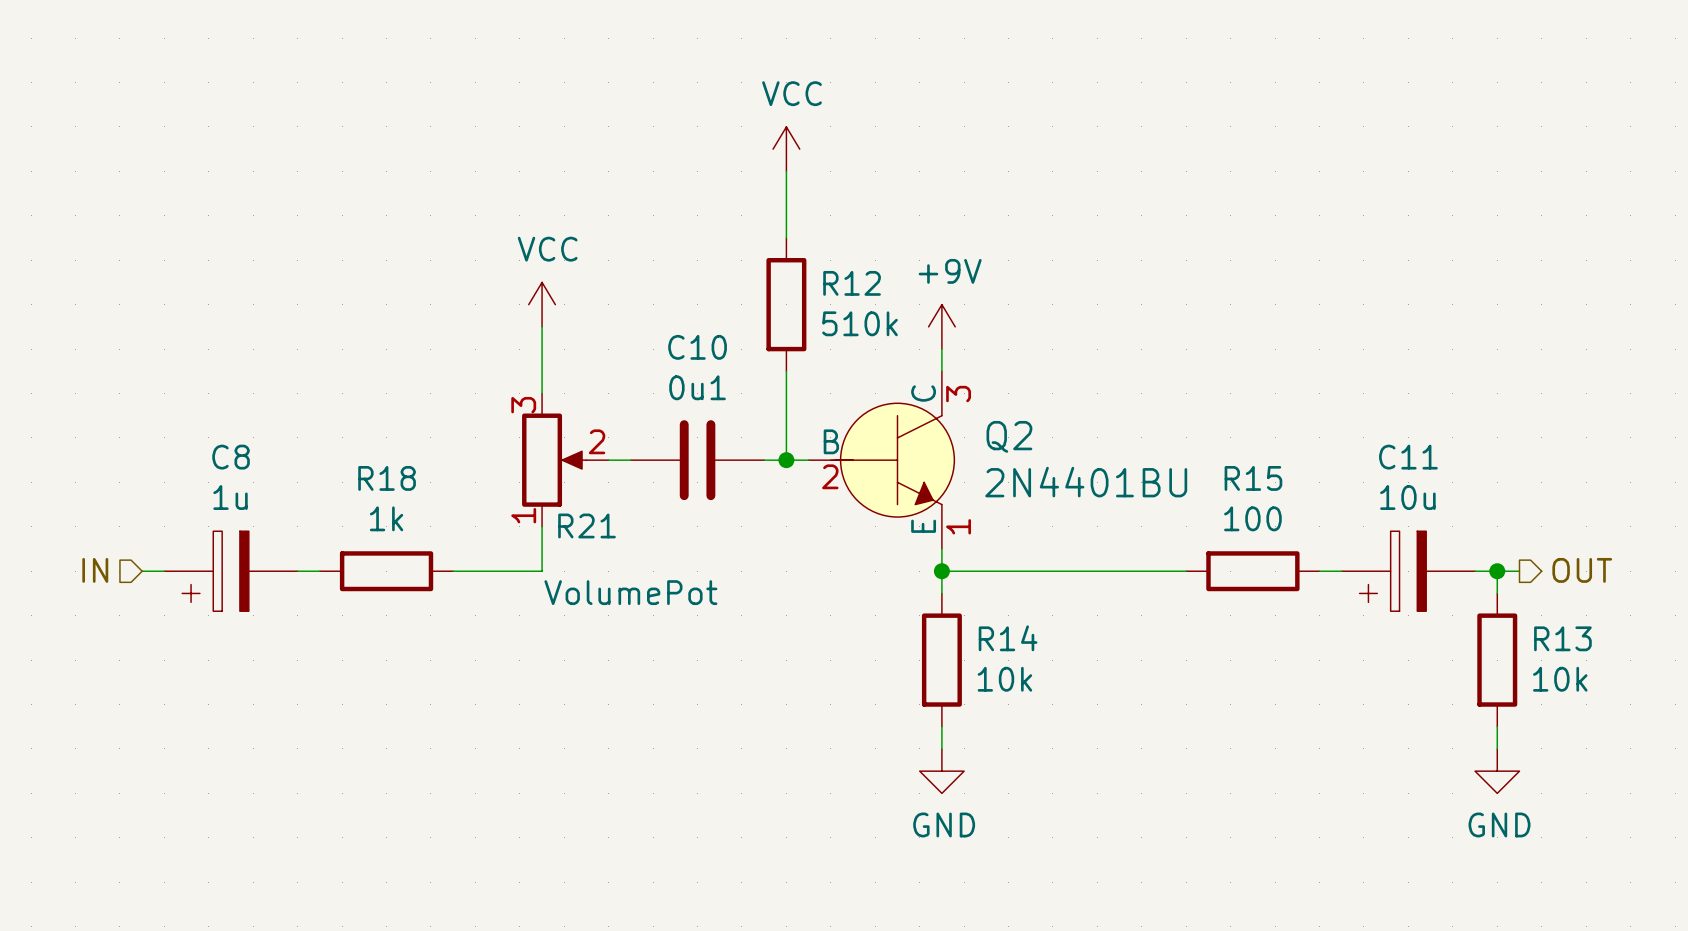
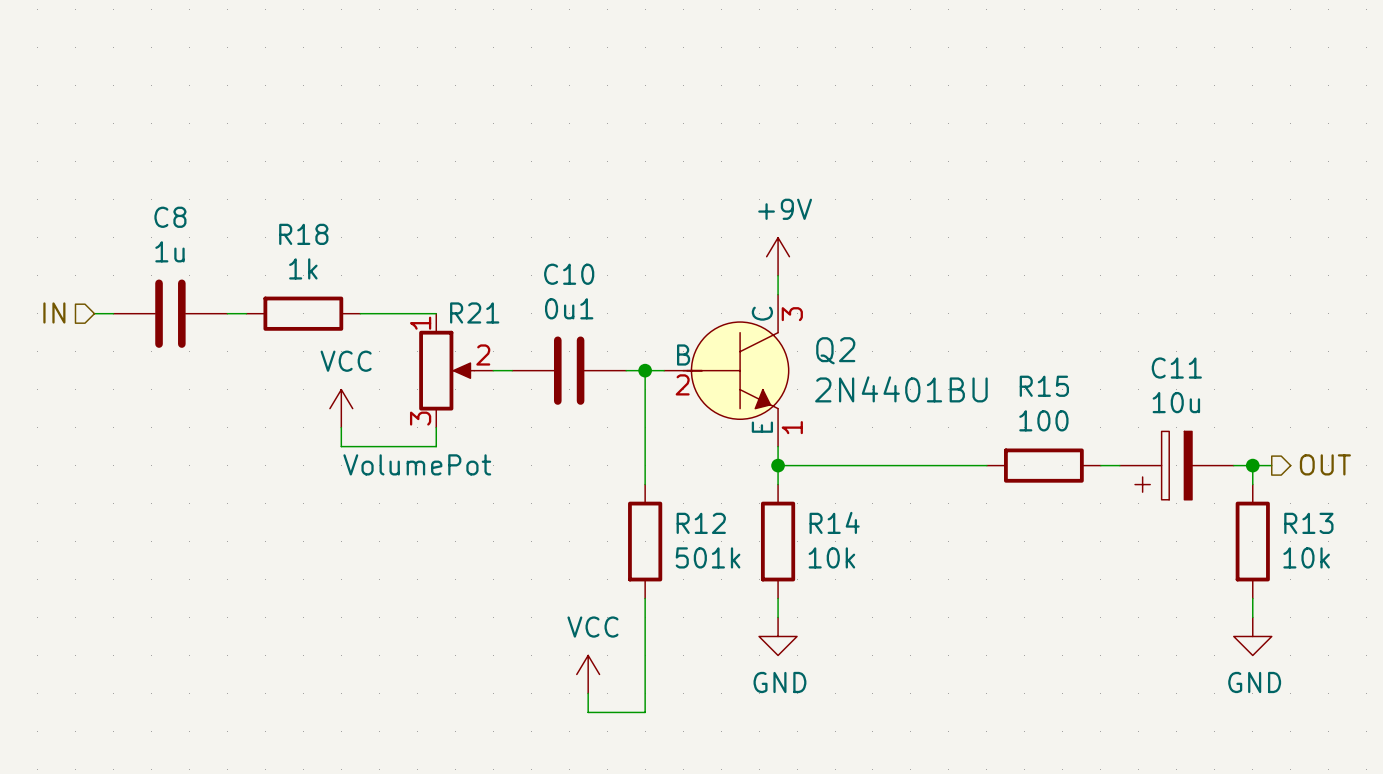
power symbol: VCC (786, 149) -> none
wire: (786, 171) (786, 238) -> none
power symbol position: VCC (542, 304) -> VCC (341, 408)
R12 position: (786, 304) -> (645, 541)
R12 value: 510k (859, 323) -> 501k (708, 557)
wire: (542, 326) (542, 393) -> (360, 313) (436, 313)
wire: (786, 371) (786, 460) -> (645, 484) (645, 370)
R21 flip: as is (554, 460) -> up-down (446, 370)
C8 symbol: [164, 531, 298, 612] -> [113, 279, 228, 348]
wire: (542, 549) (542, 571) (453, 571) -> (436, 446) (341, 446) (341, 427)
hierarchical label position: IN (95, 570) -> IN (54, 312)
wire: (142, 571) (164, 571) -> (94, 313) (113, 313)
wire: (297, 571) (319, 571) -> (227, 313) (246, 313)
R18 position: (386, 571) -> (303, 313)
R21 value position: VolumePot (630, 592) -> VolumePot (417, 464)
wire: none -> (645, 598) (645, 712) (588, 712) (588, 693)
power symbol: none -> VCC (588, 674)

